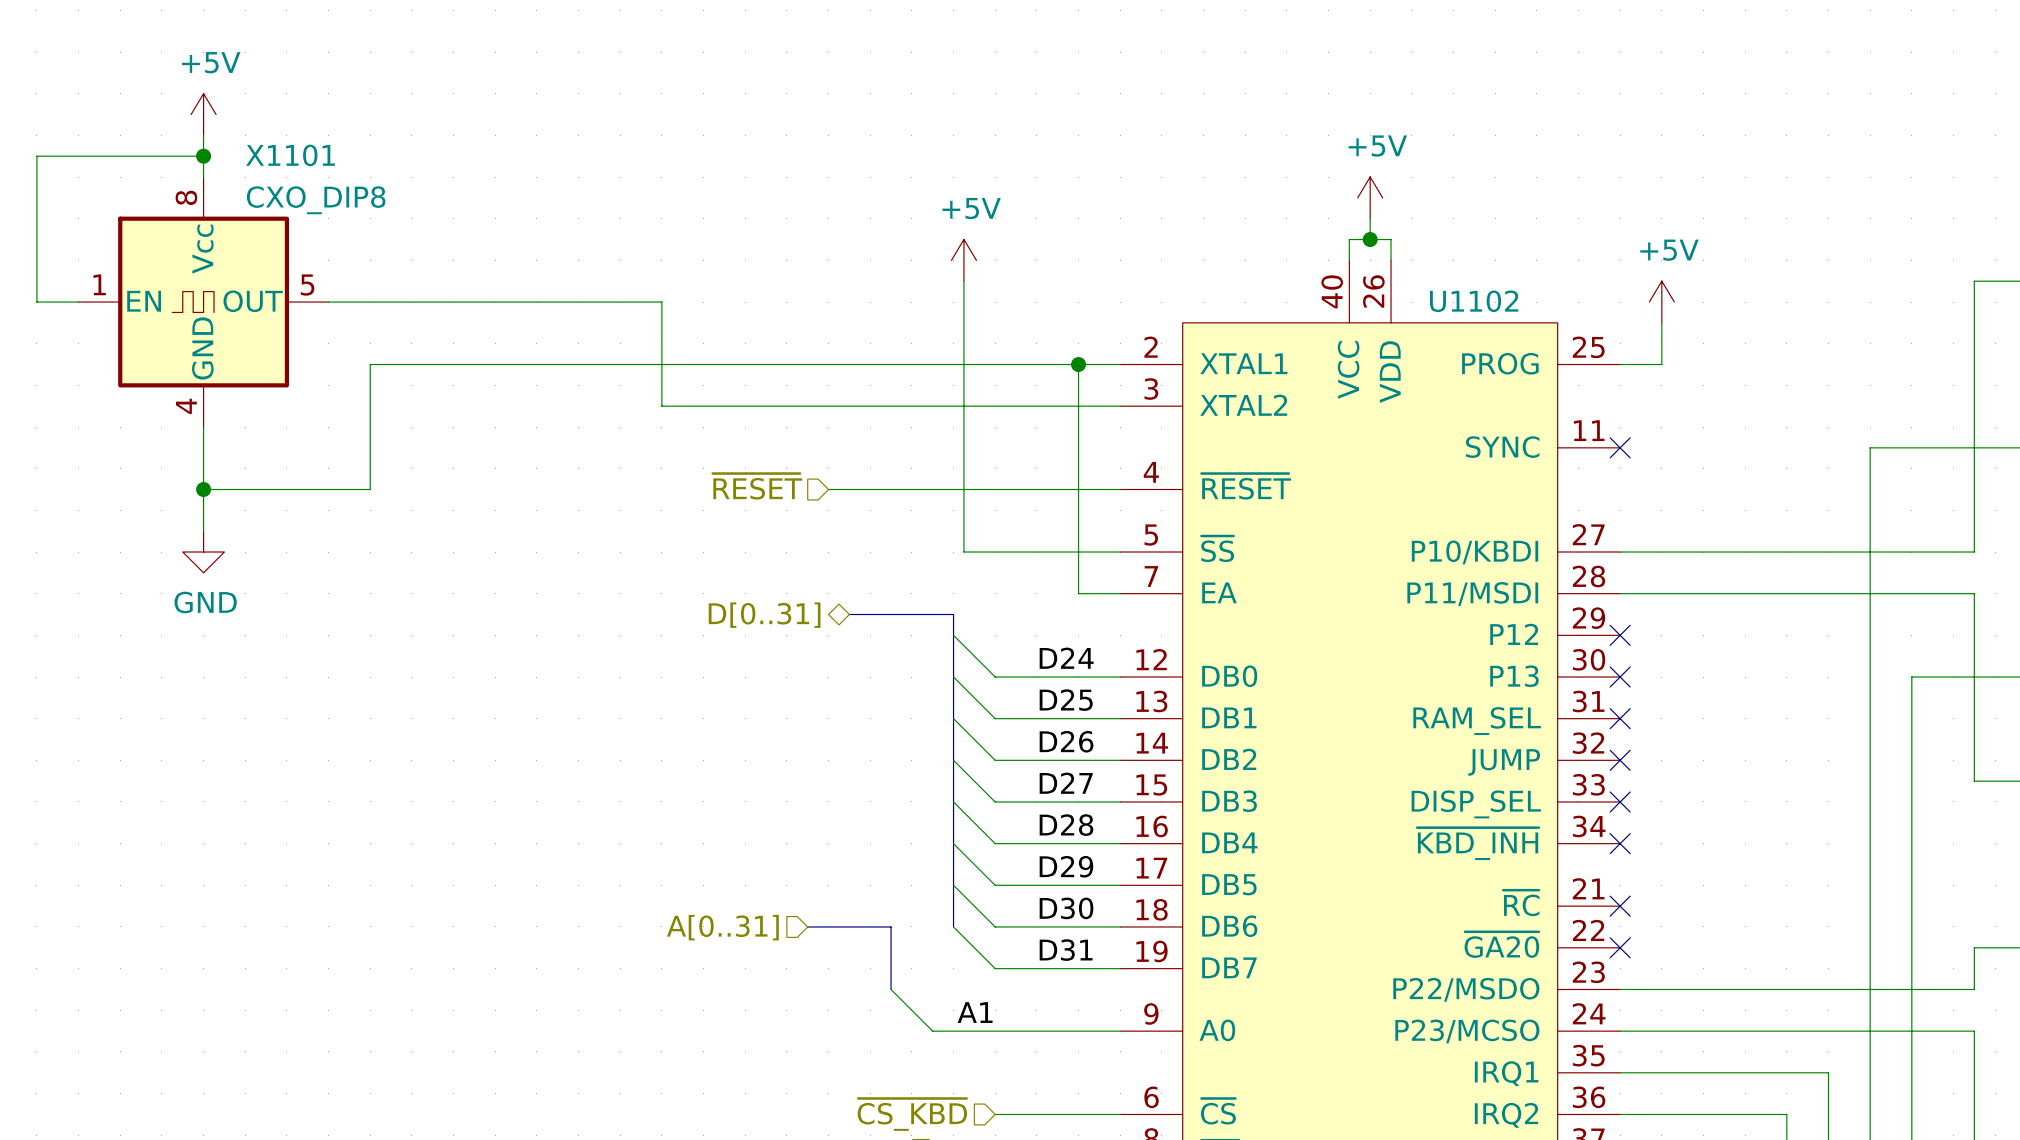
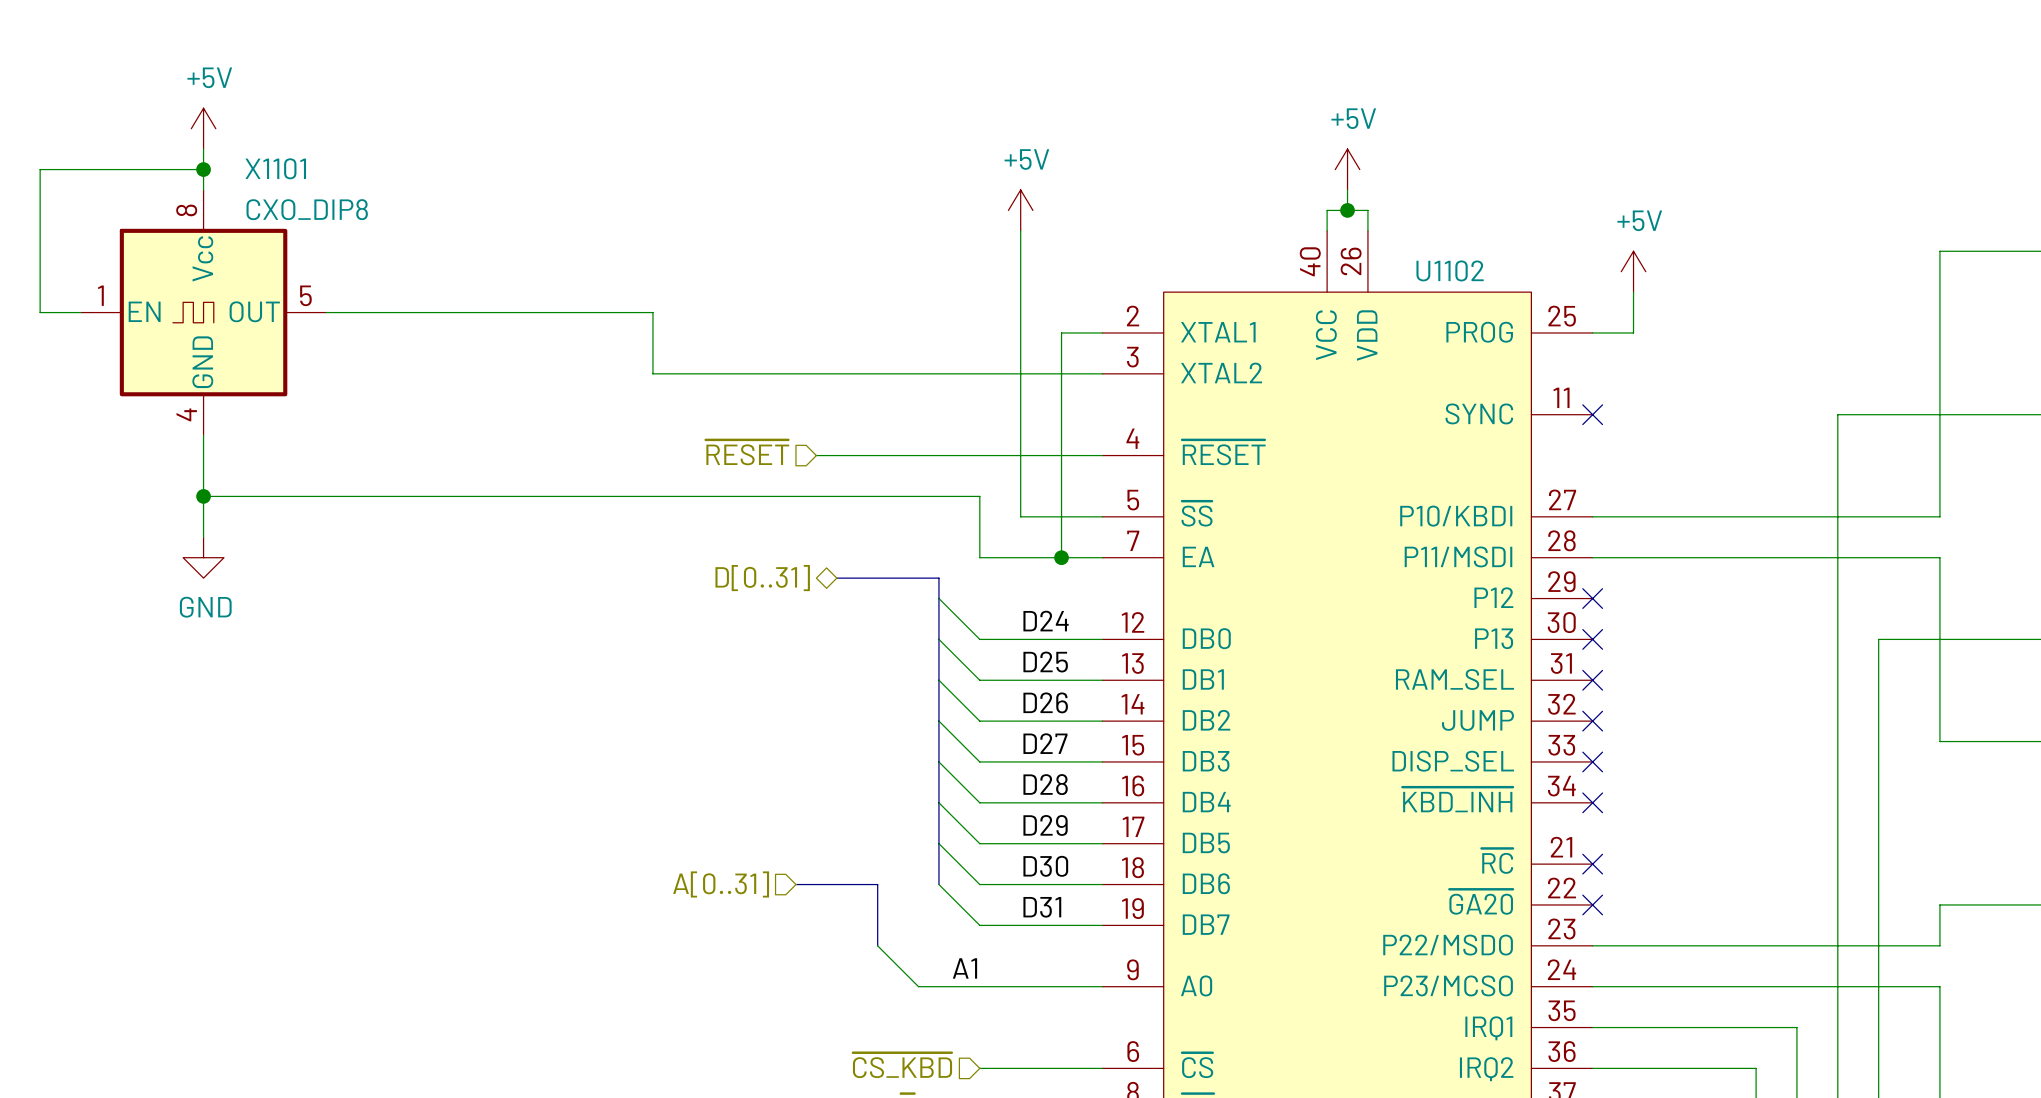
power symbol position: +5V (203, 114) -> +5V (203, 128)
wire: (203, 156) (36, 156) (36, 197) -> (203, 169) (40, 169)
junction position: (203, 156) -> (203, 169)
power symbol position: +5V (963, 260) -> +5V (1020, 210)
wire: (963, 281) (963, 552) (1036, 552) -> (1020, 230) (1020, 516)
wire: (36, 302) (78, 302) -> (40, 271) (40, 312) (80, 312)
X1101 position: (203, 302) -> (203, 312)
wire: (328, 302) (661, 302) (661, 343) -> (326, 312) (652, 312)
wire: (1078, 364) (370, 364) (370, 489) (203, 489) -> none
junction: (1078, 364) -> none
junction position: (203, 489) -> (203, 496)
power symbol position: GND (203, 552) -> GND (203, 557)
wire: none -> (203, 537) (203, 496) (979, 496) (979, 557) (1061, 557)
junction: none -> (1061, 557)

